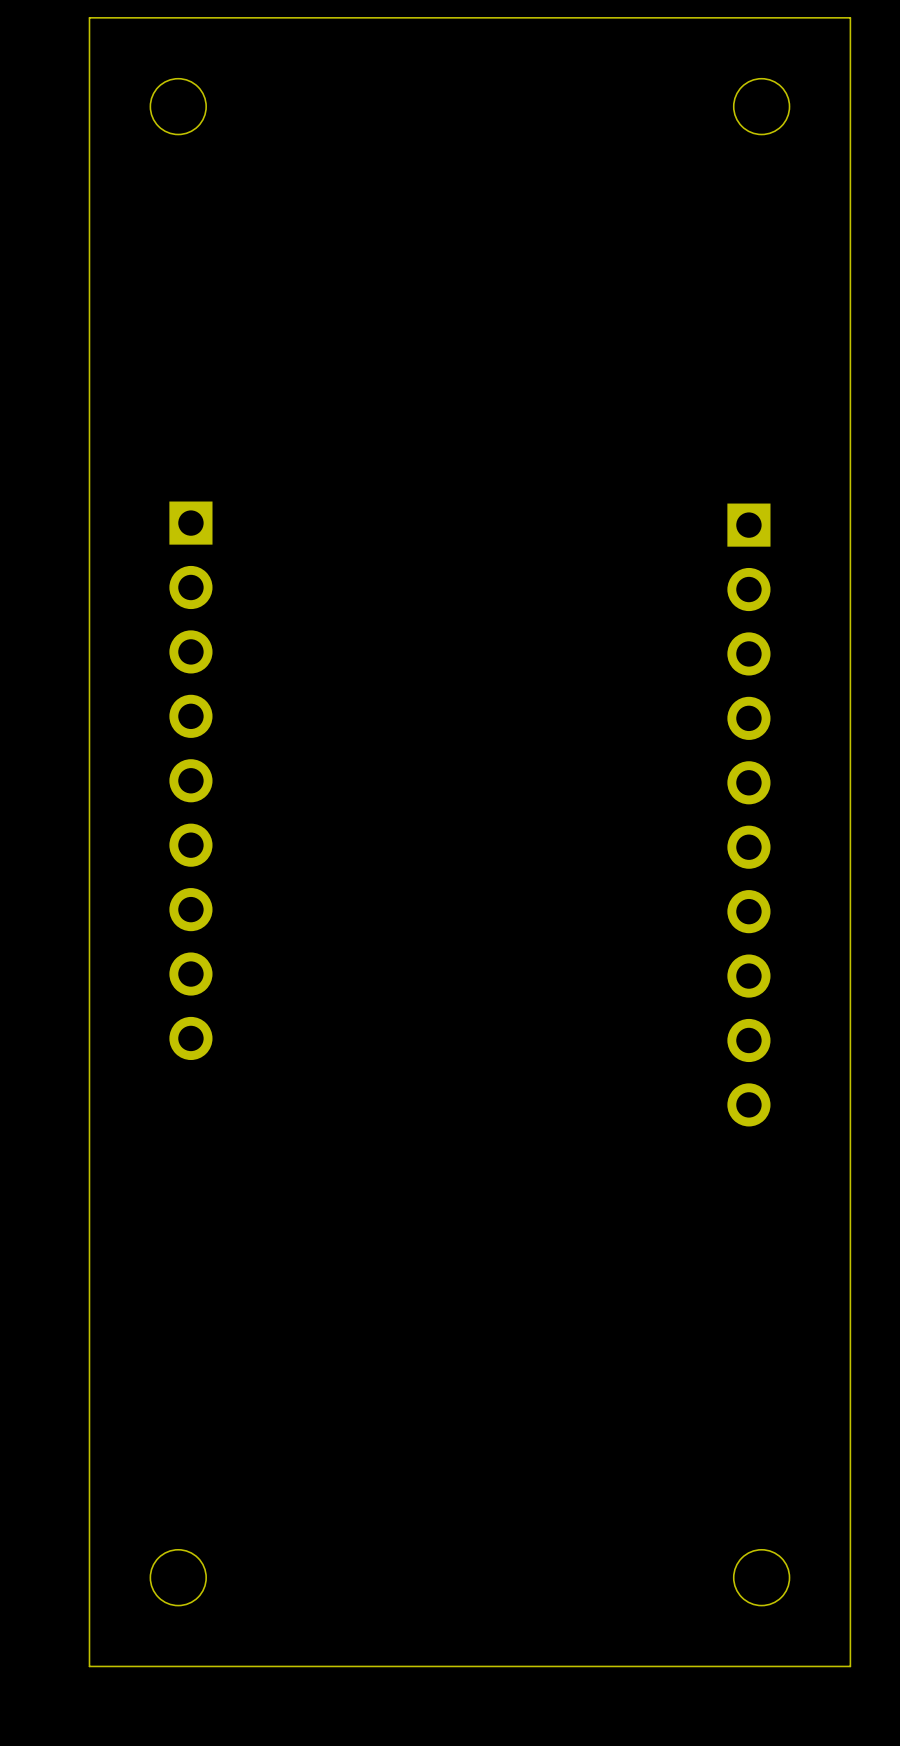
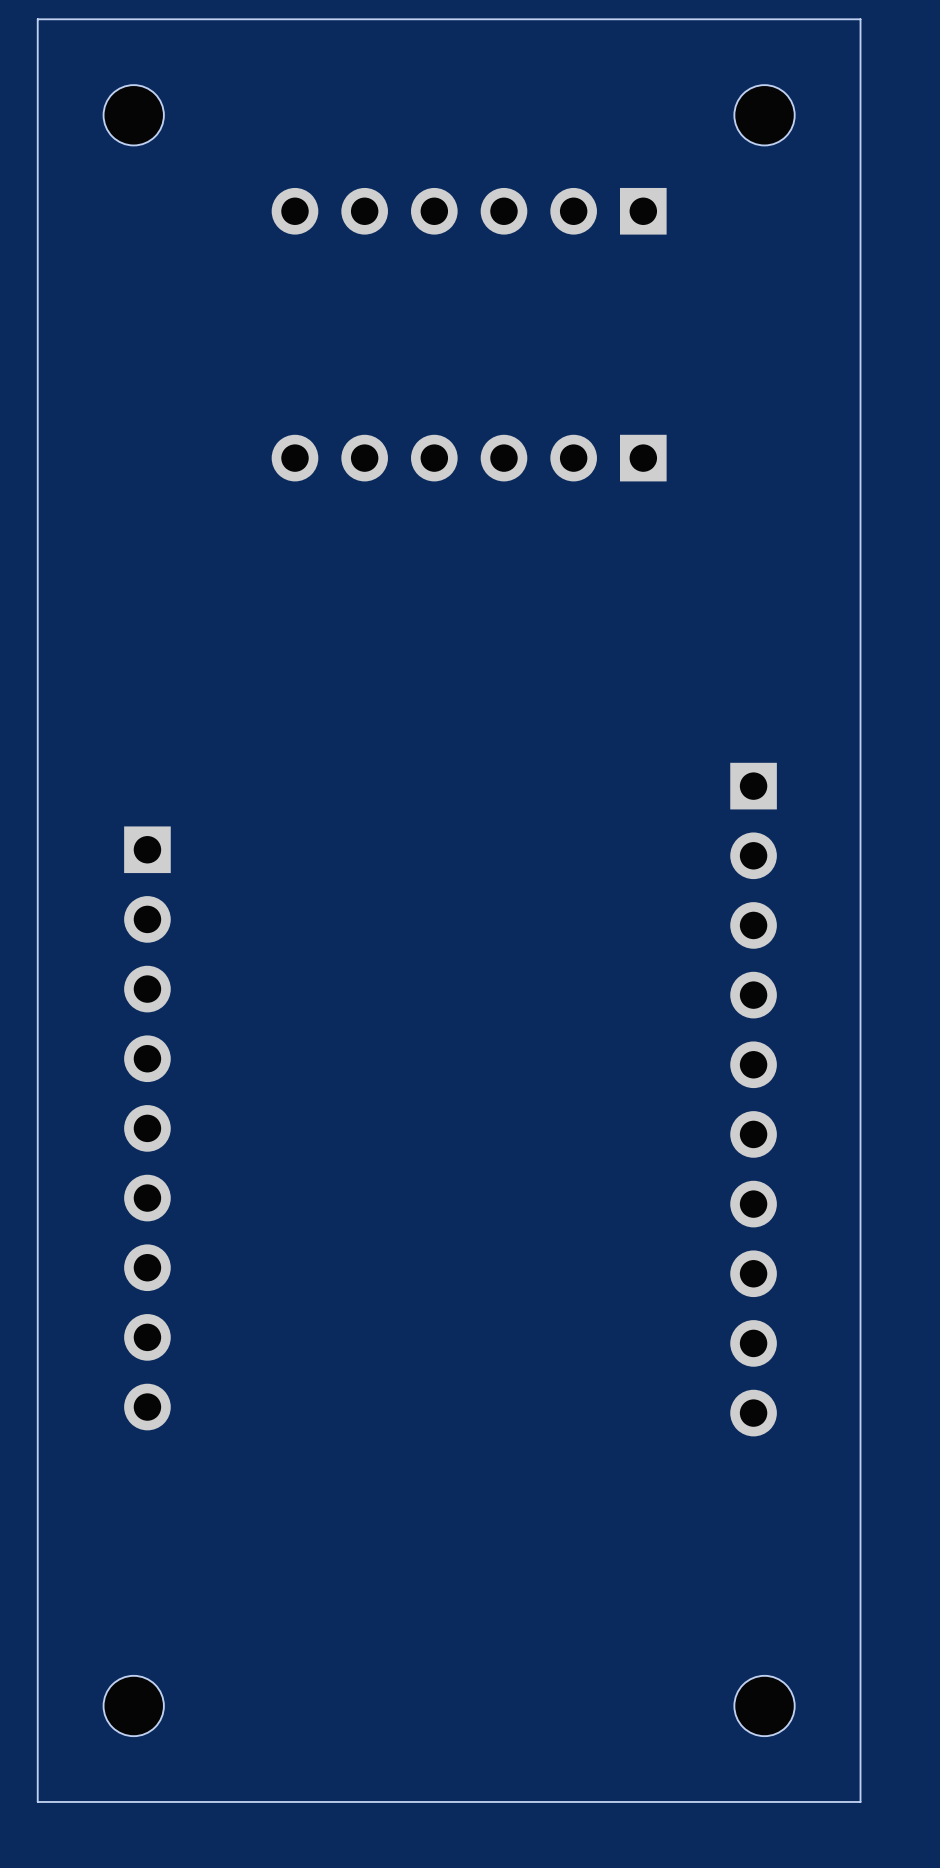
part: none -> (469, 211)
part: none -> (469, 458)
part position: (190, 780) -> (147, 1128)
part position: (748, 815) -> (753, 1099)

